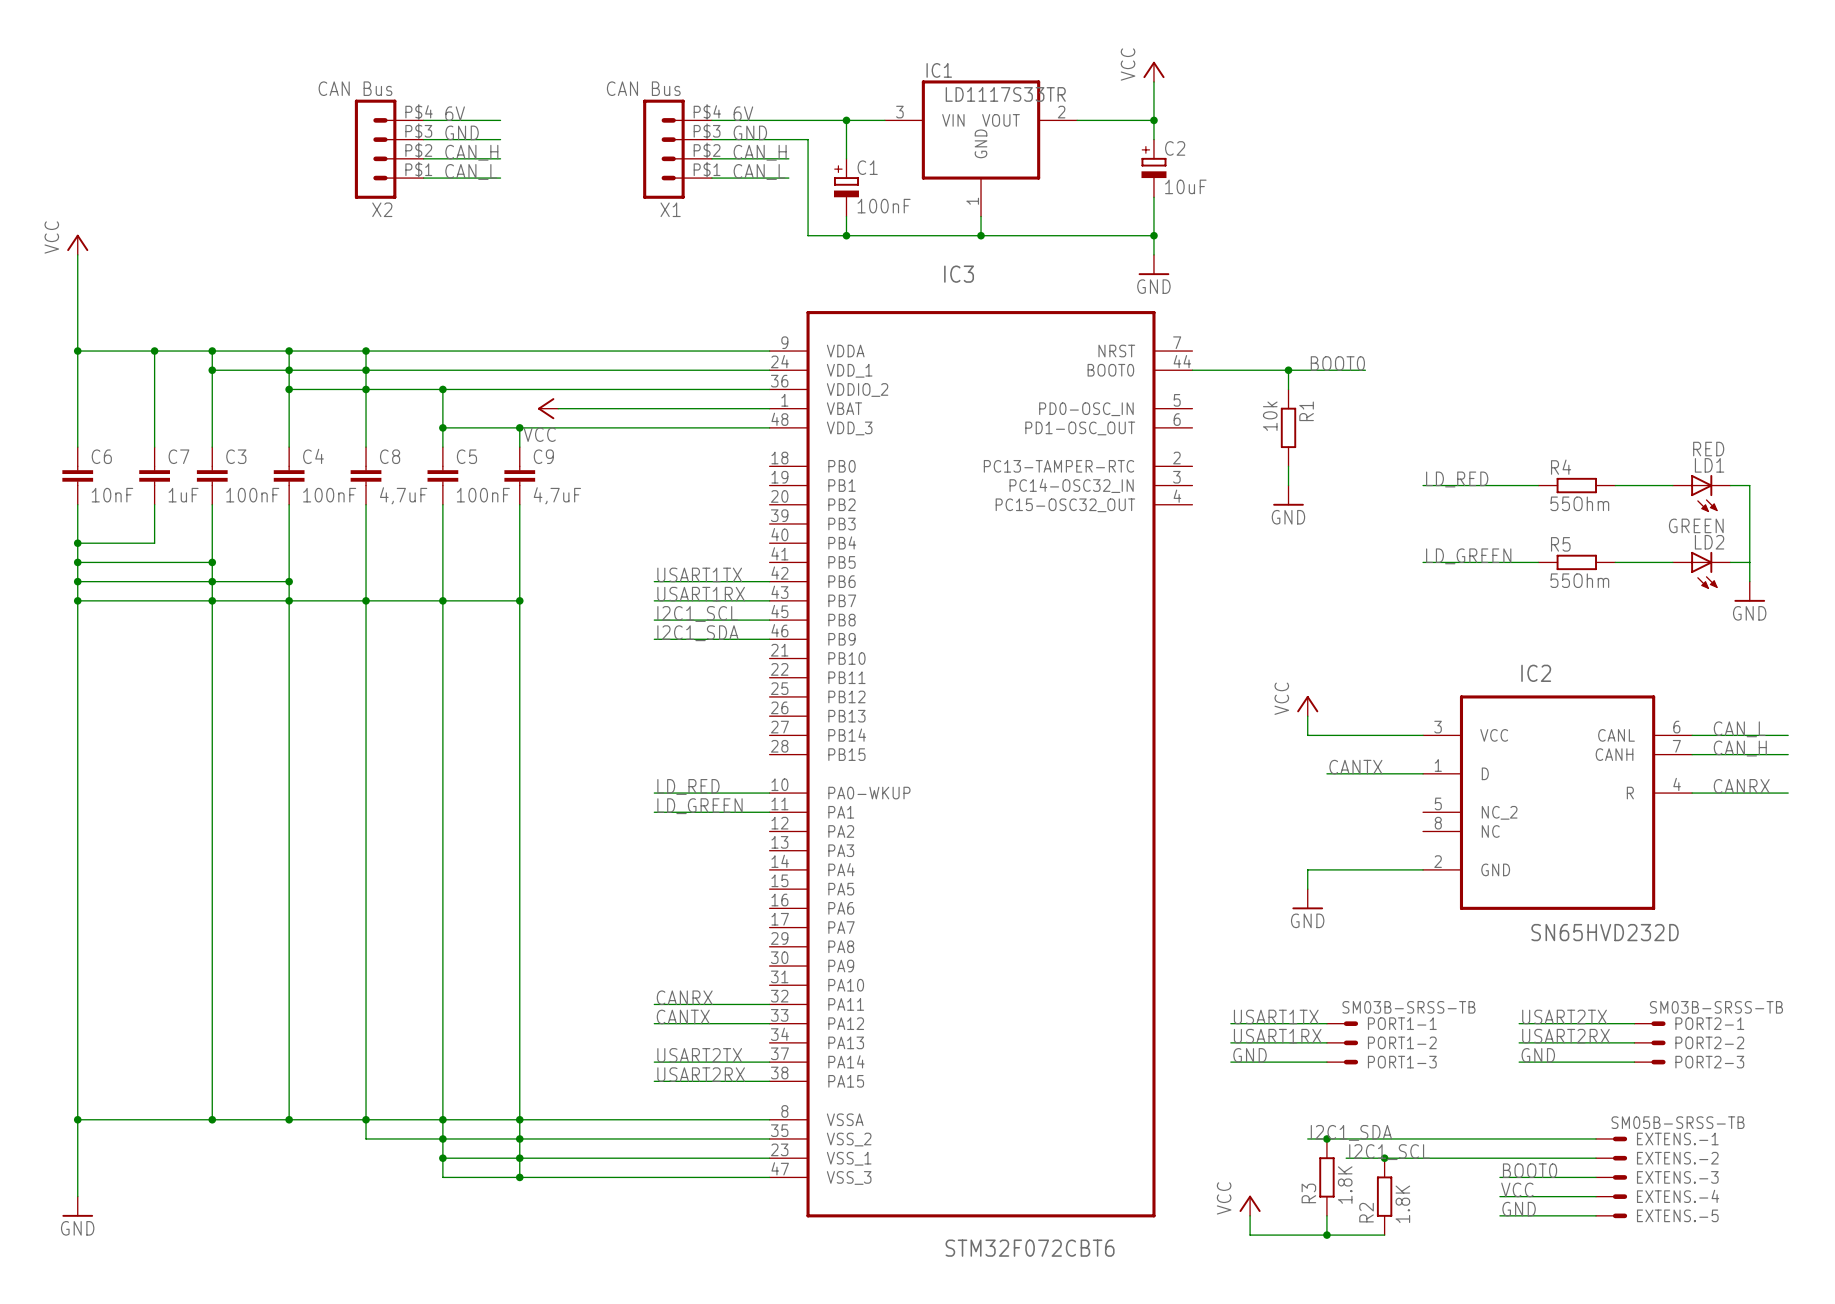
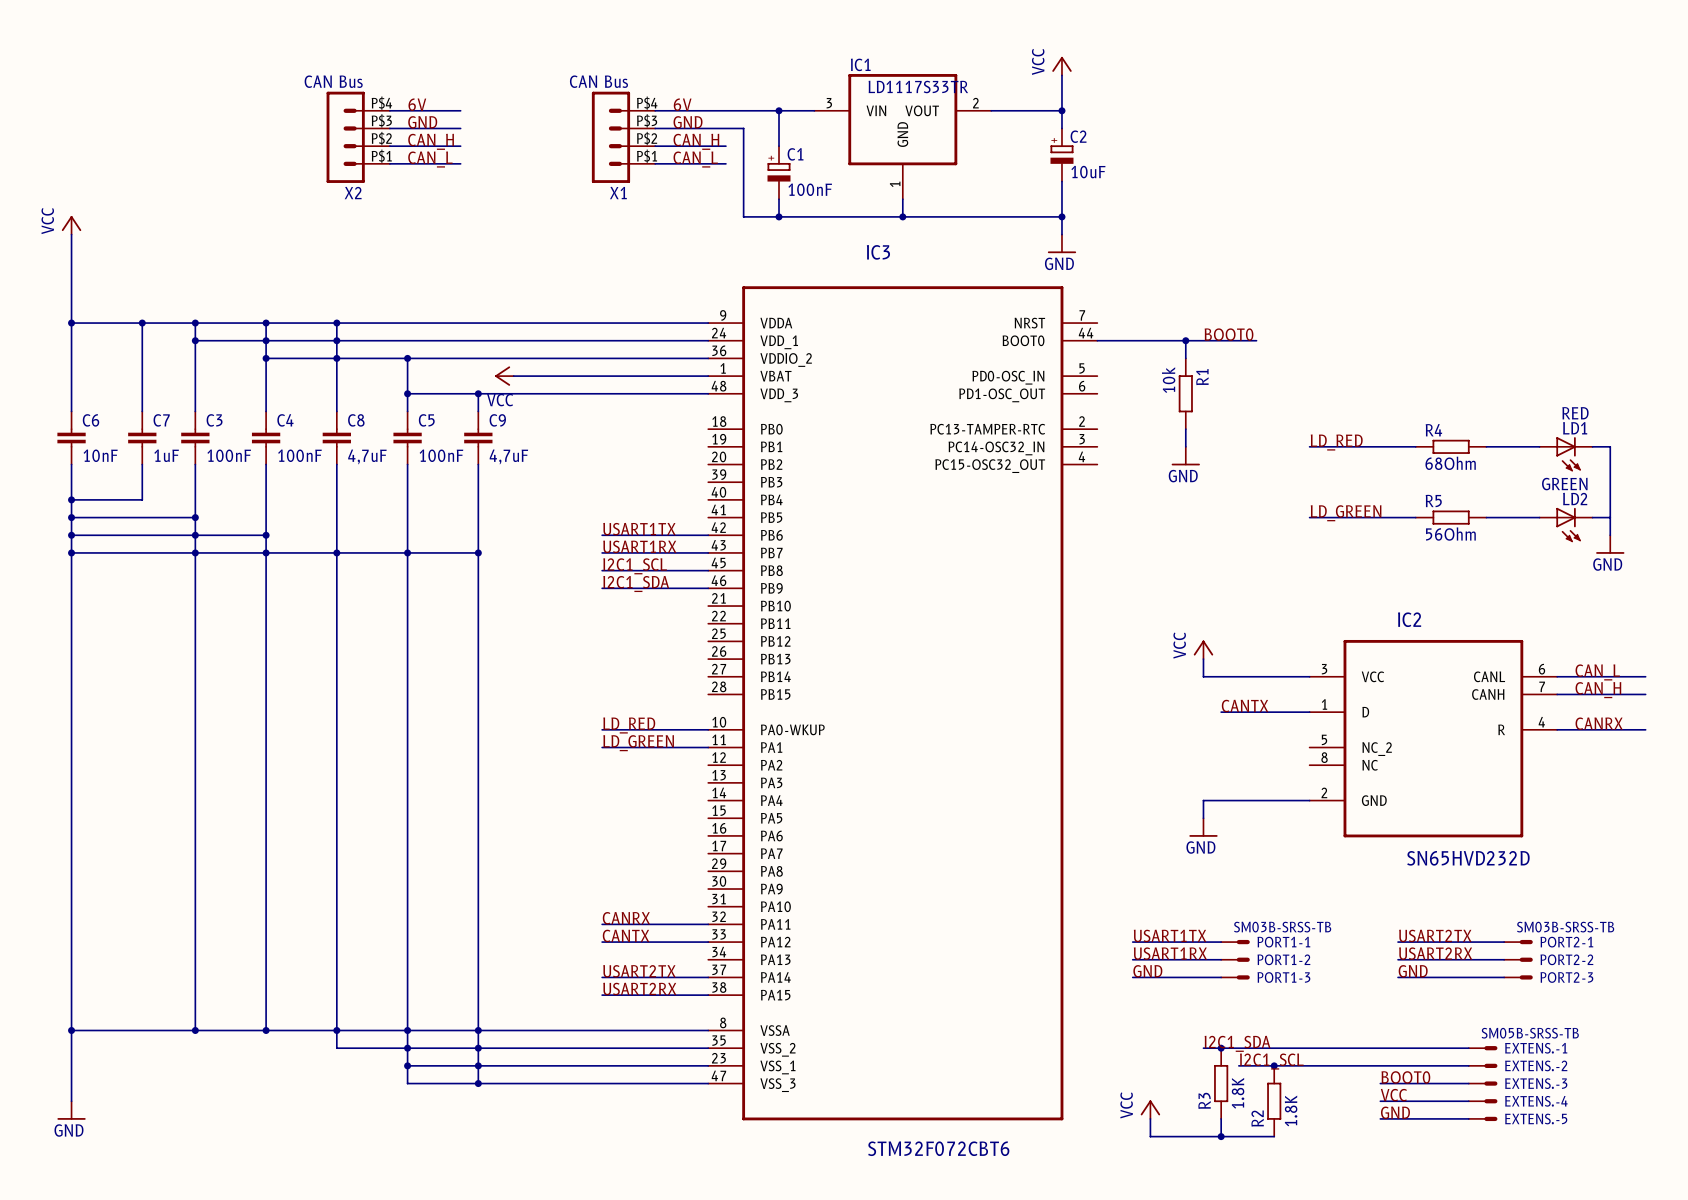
R4 value: 55Ohm (1579, 503) -> 68Ohm (1450, 463)
R5 value: 55Ohm (1579, 580) -> 56Ohm (1450, 534)

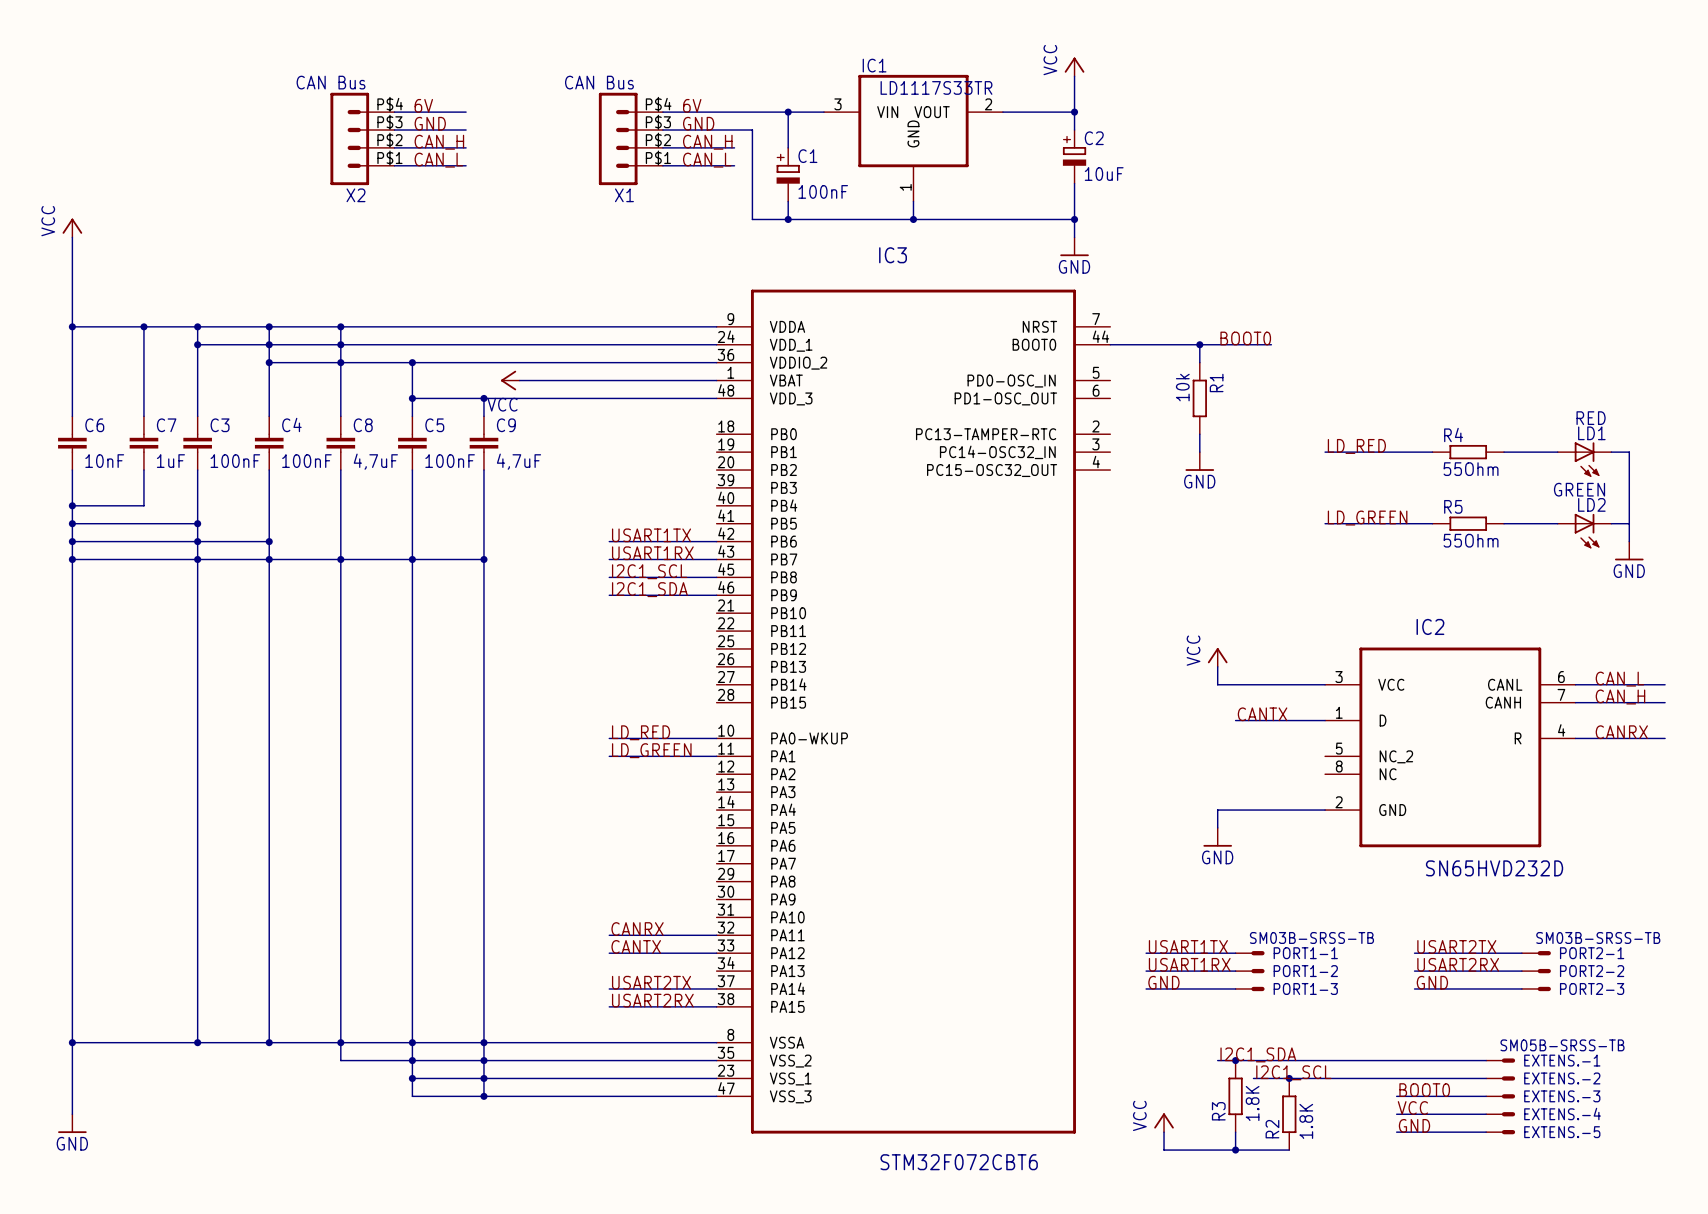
R4 value: 68Ohm (1450, 463) -> 55Ohm (1471, 469)
R5 value: 56Ohm (1450, 534) -> 55Ohm (1471, 540)

